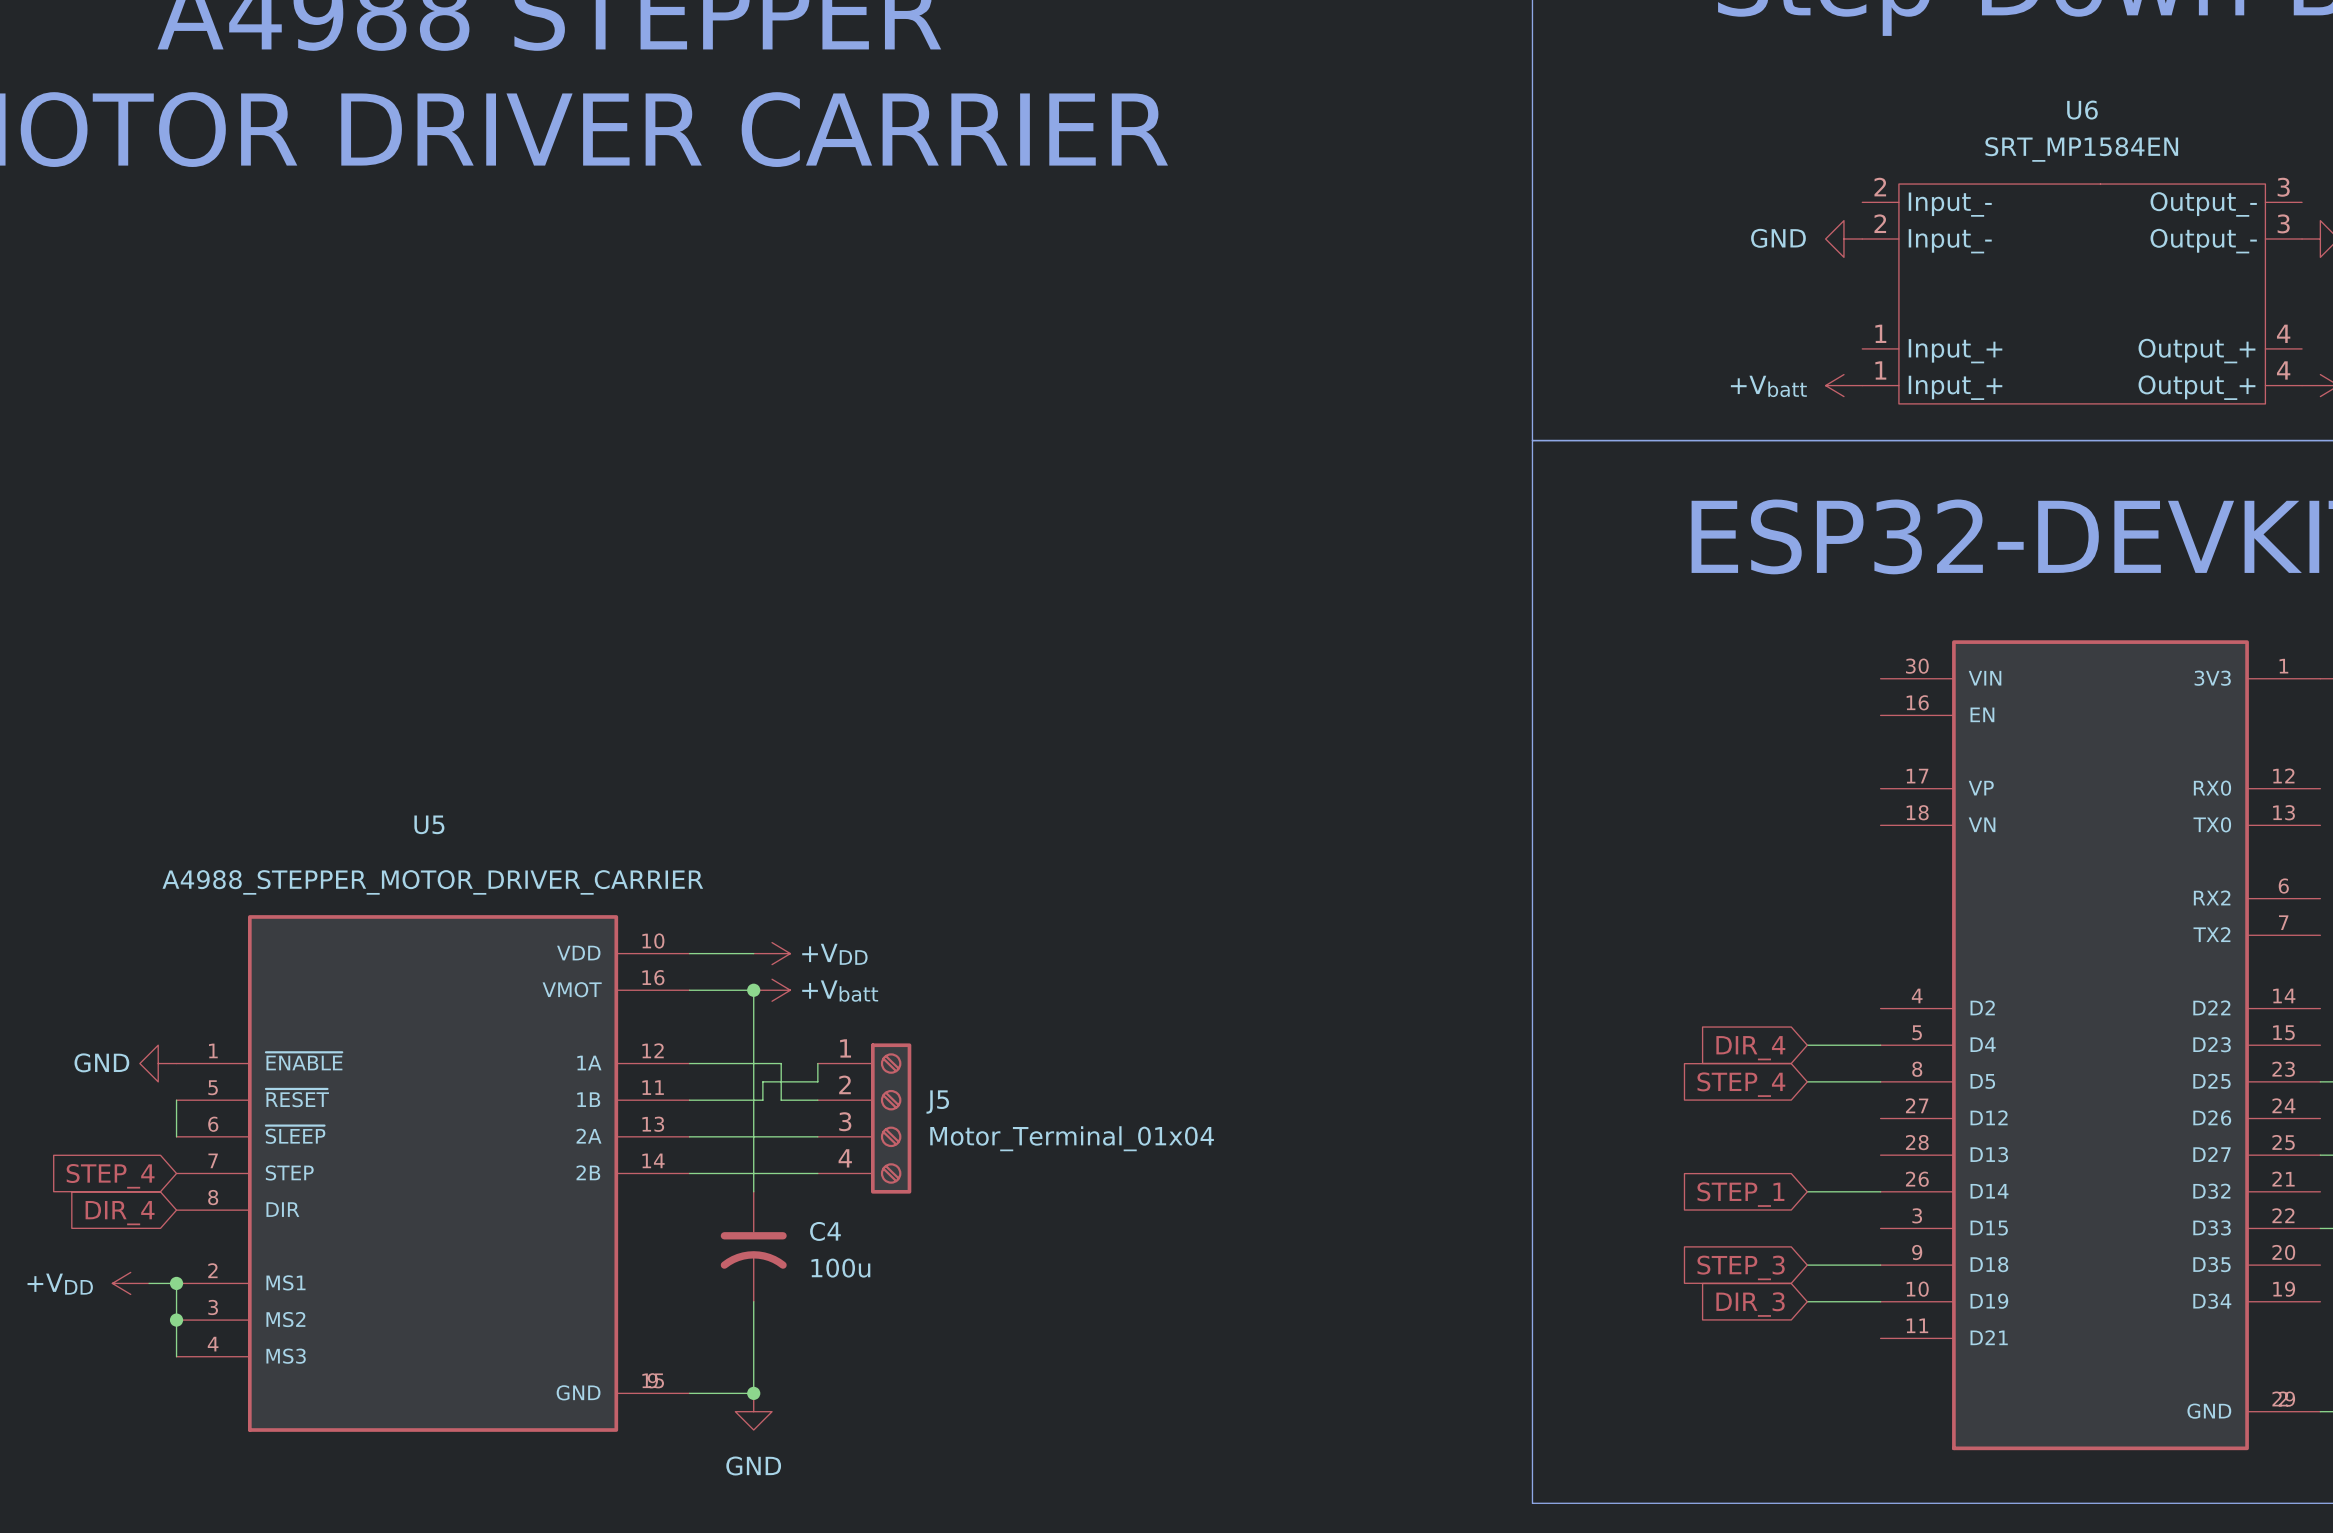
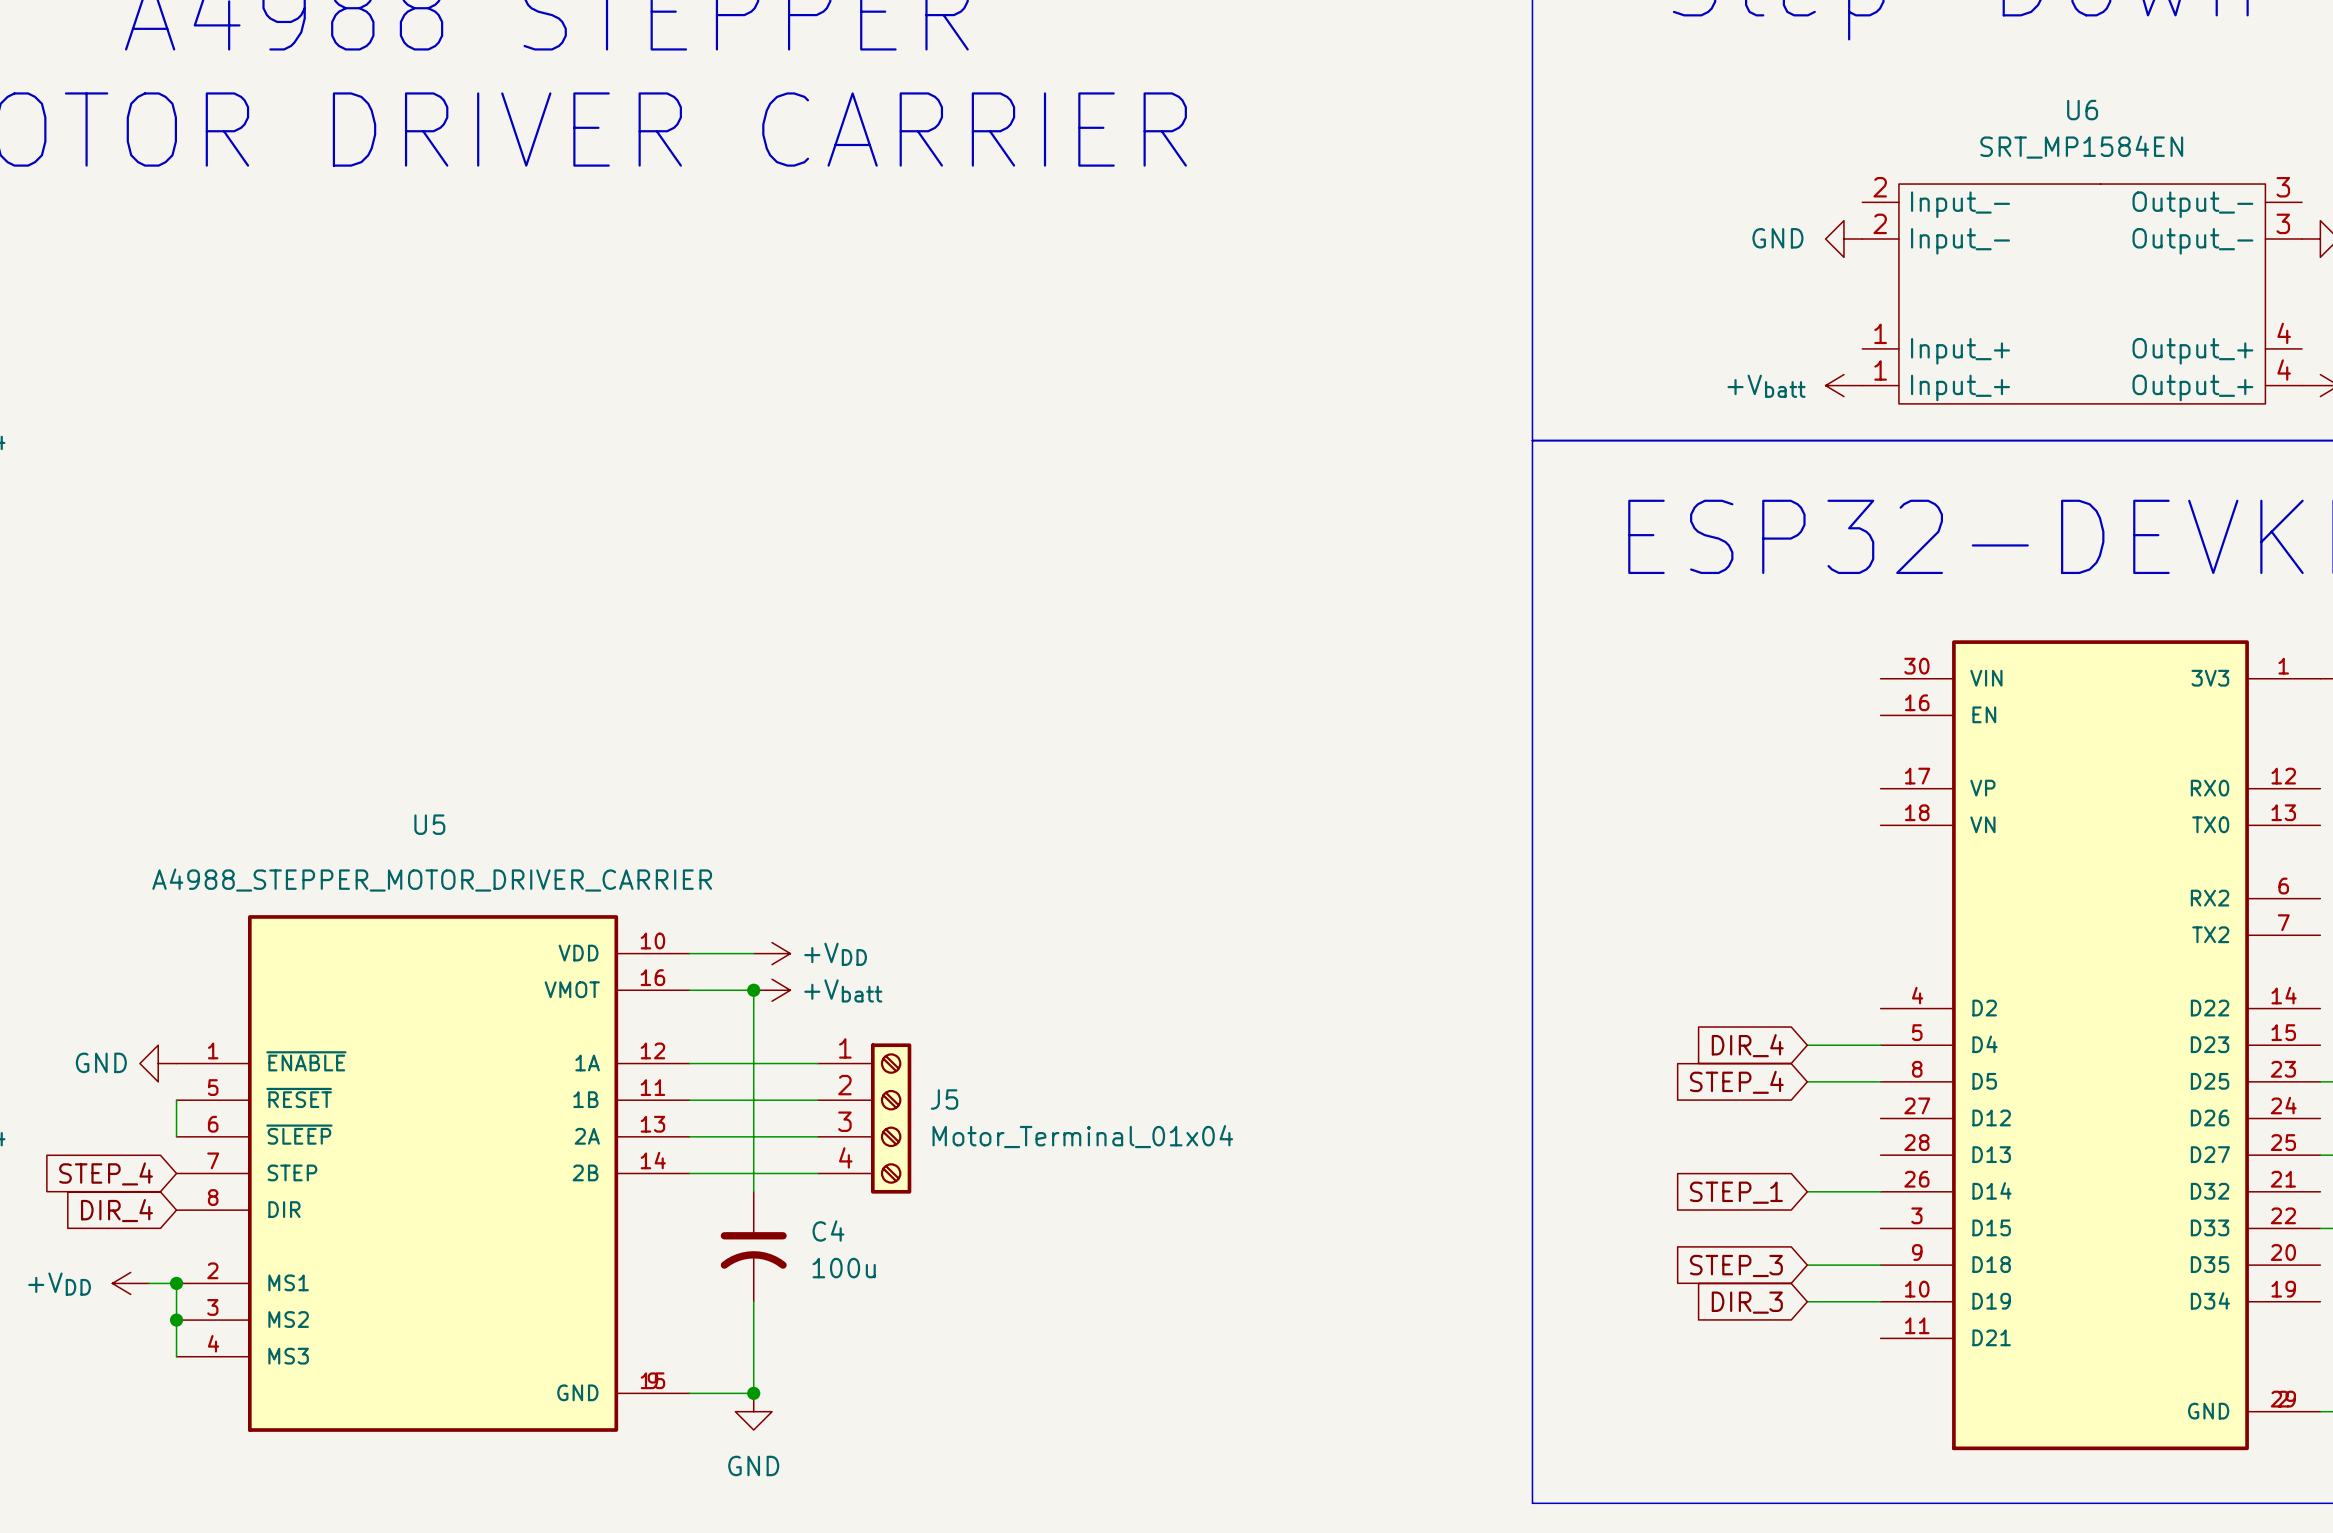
wire: (781, 1063) (781, 1100) -> (762, 1100) (781, 1100)
wire: (817, 1063) (817, 1081) (762, 1081) (762, 1100) -> (817, 1063) (781, 1063)

